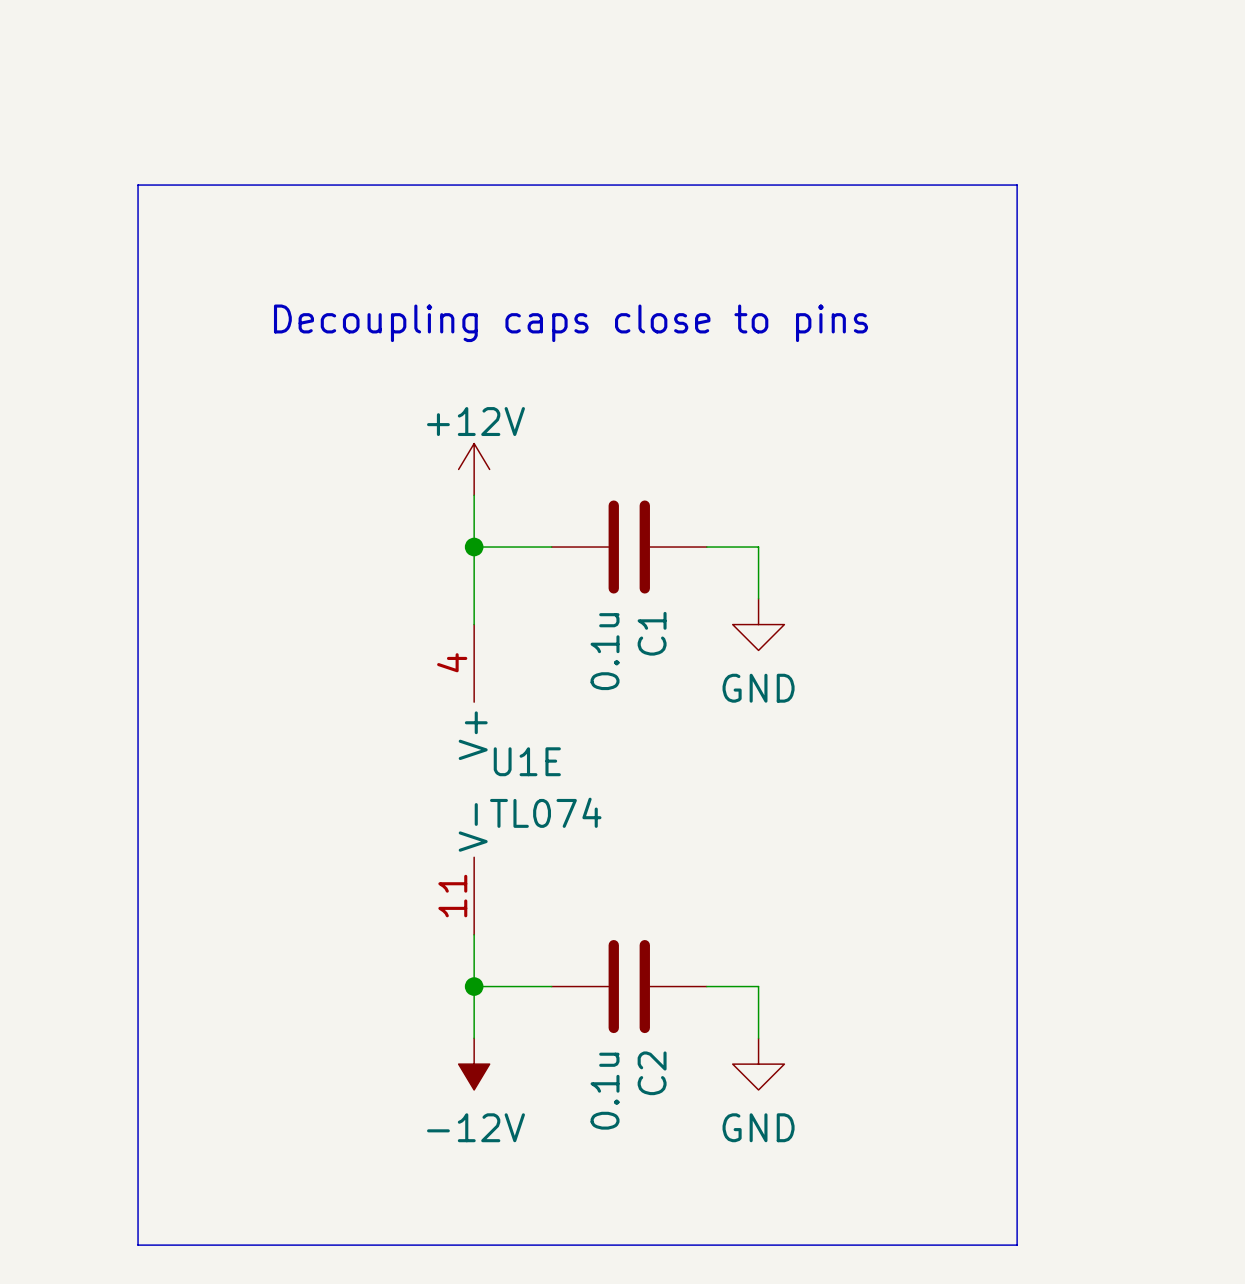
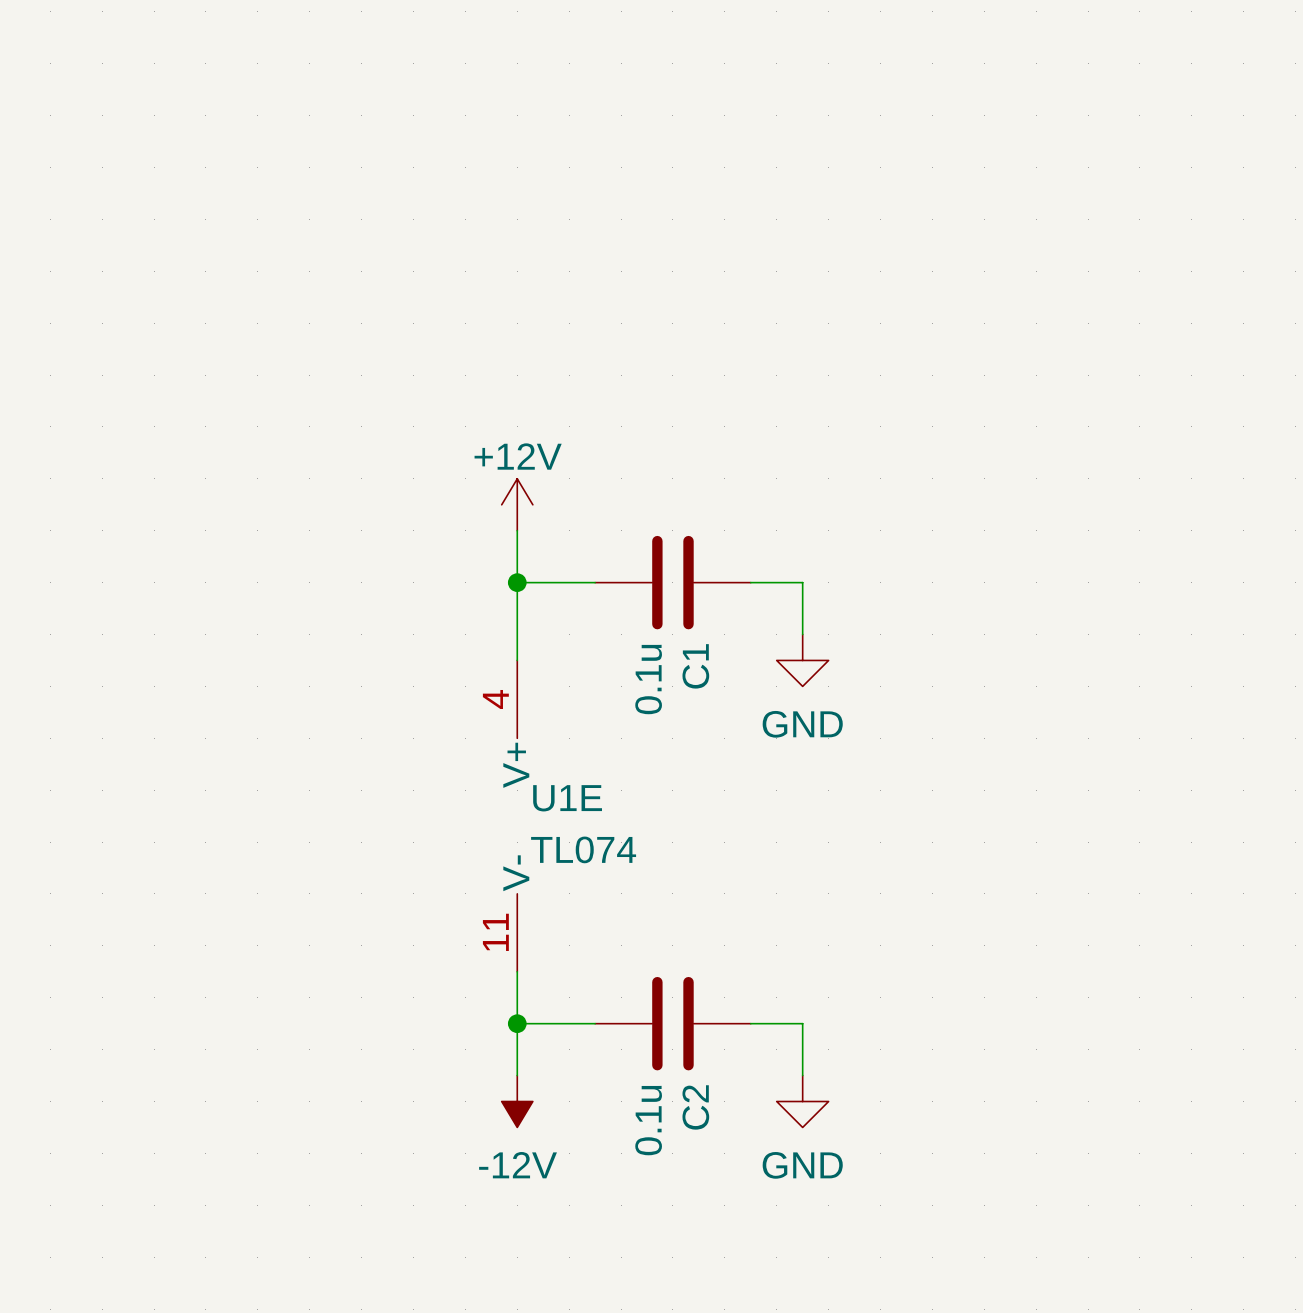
line: (138, 185) (1017, 185) (1017, 1245) (138, 1245) (138, 185) -> none
text: Decoupling caps close to pins (570, 323) -> none

